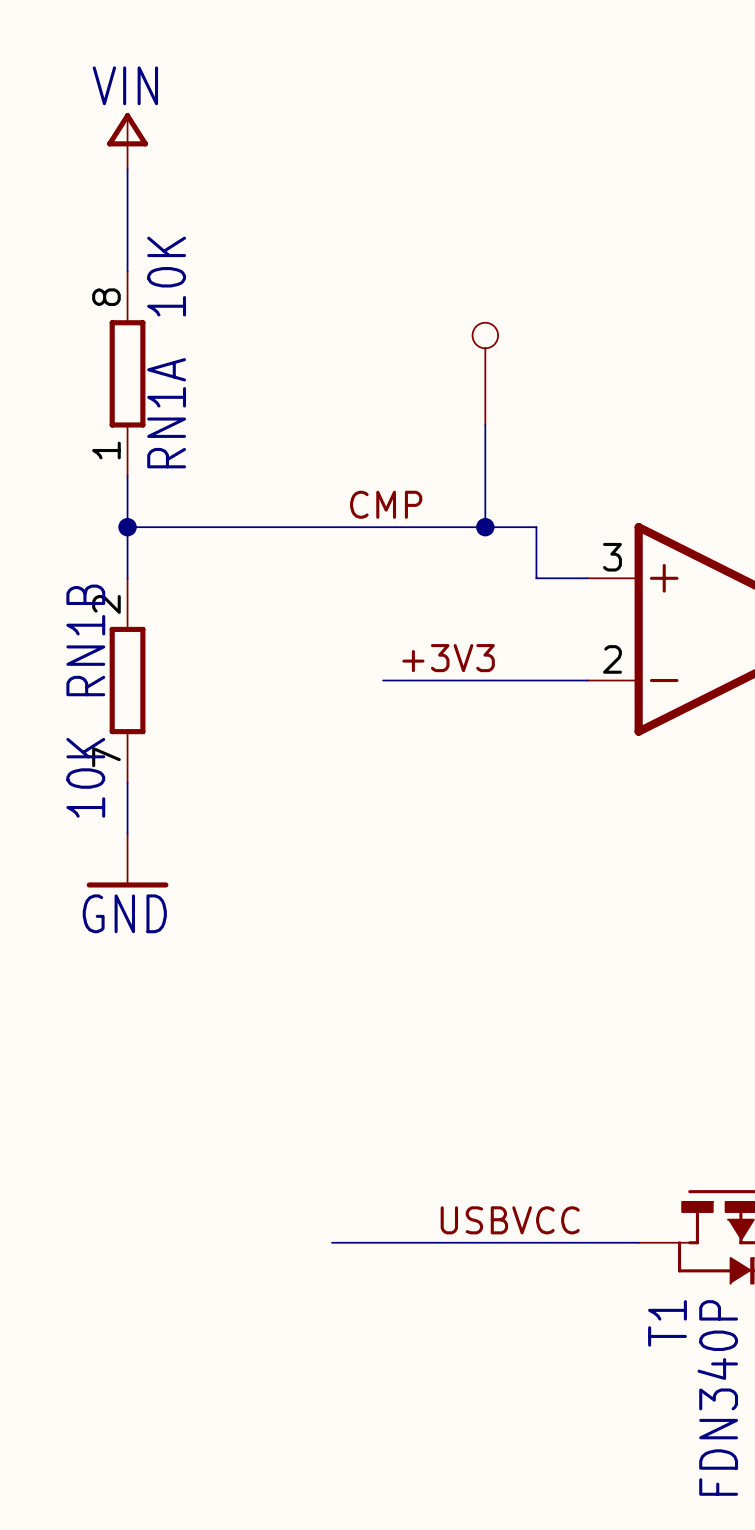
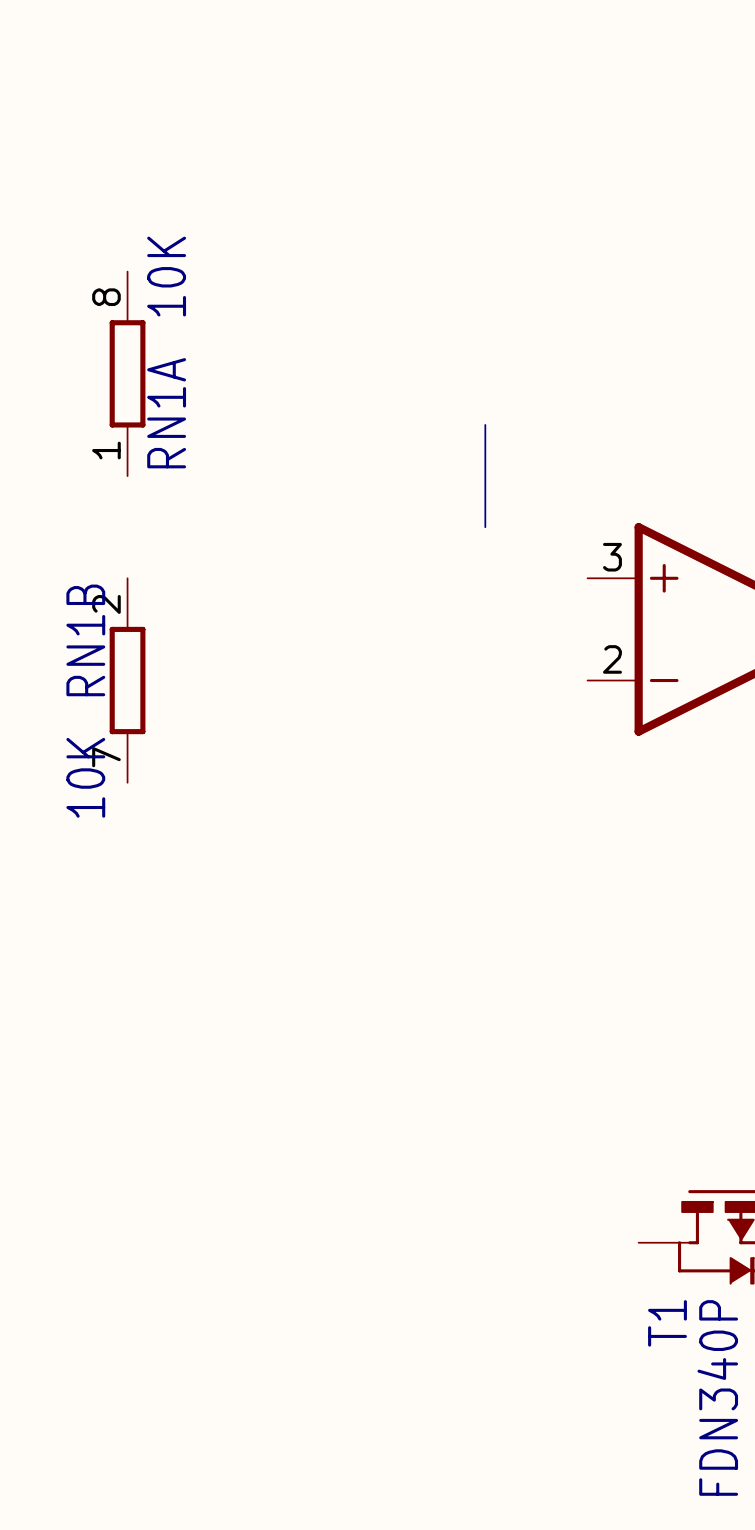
power symbol: VIN (127, 141) -> none
wire: (127, 169) (127, 271) -> none
part: (485, 373) -> none
wire: (127, 476) (127, 578) -> none
label: CMP (386, 504) -> none
wire: (127, 527) (536, 527) (536, 578) (587, 578) -> none
junction: (127, 527) -> none
junction: (485, 527) -> none
label: +3V3 (448, 658) -> none
wire: (383, 680) (587, 680) -> none
wire: (127, 782) (127, 833) -> none
power symbol: GND (127, 860) -> none
label: USBVCC (510, 1220) -> none
wire: (331, 1242) (638, 1242) -> none

